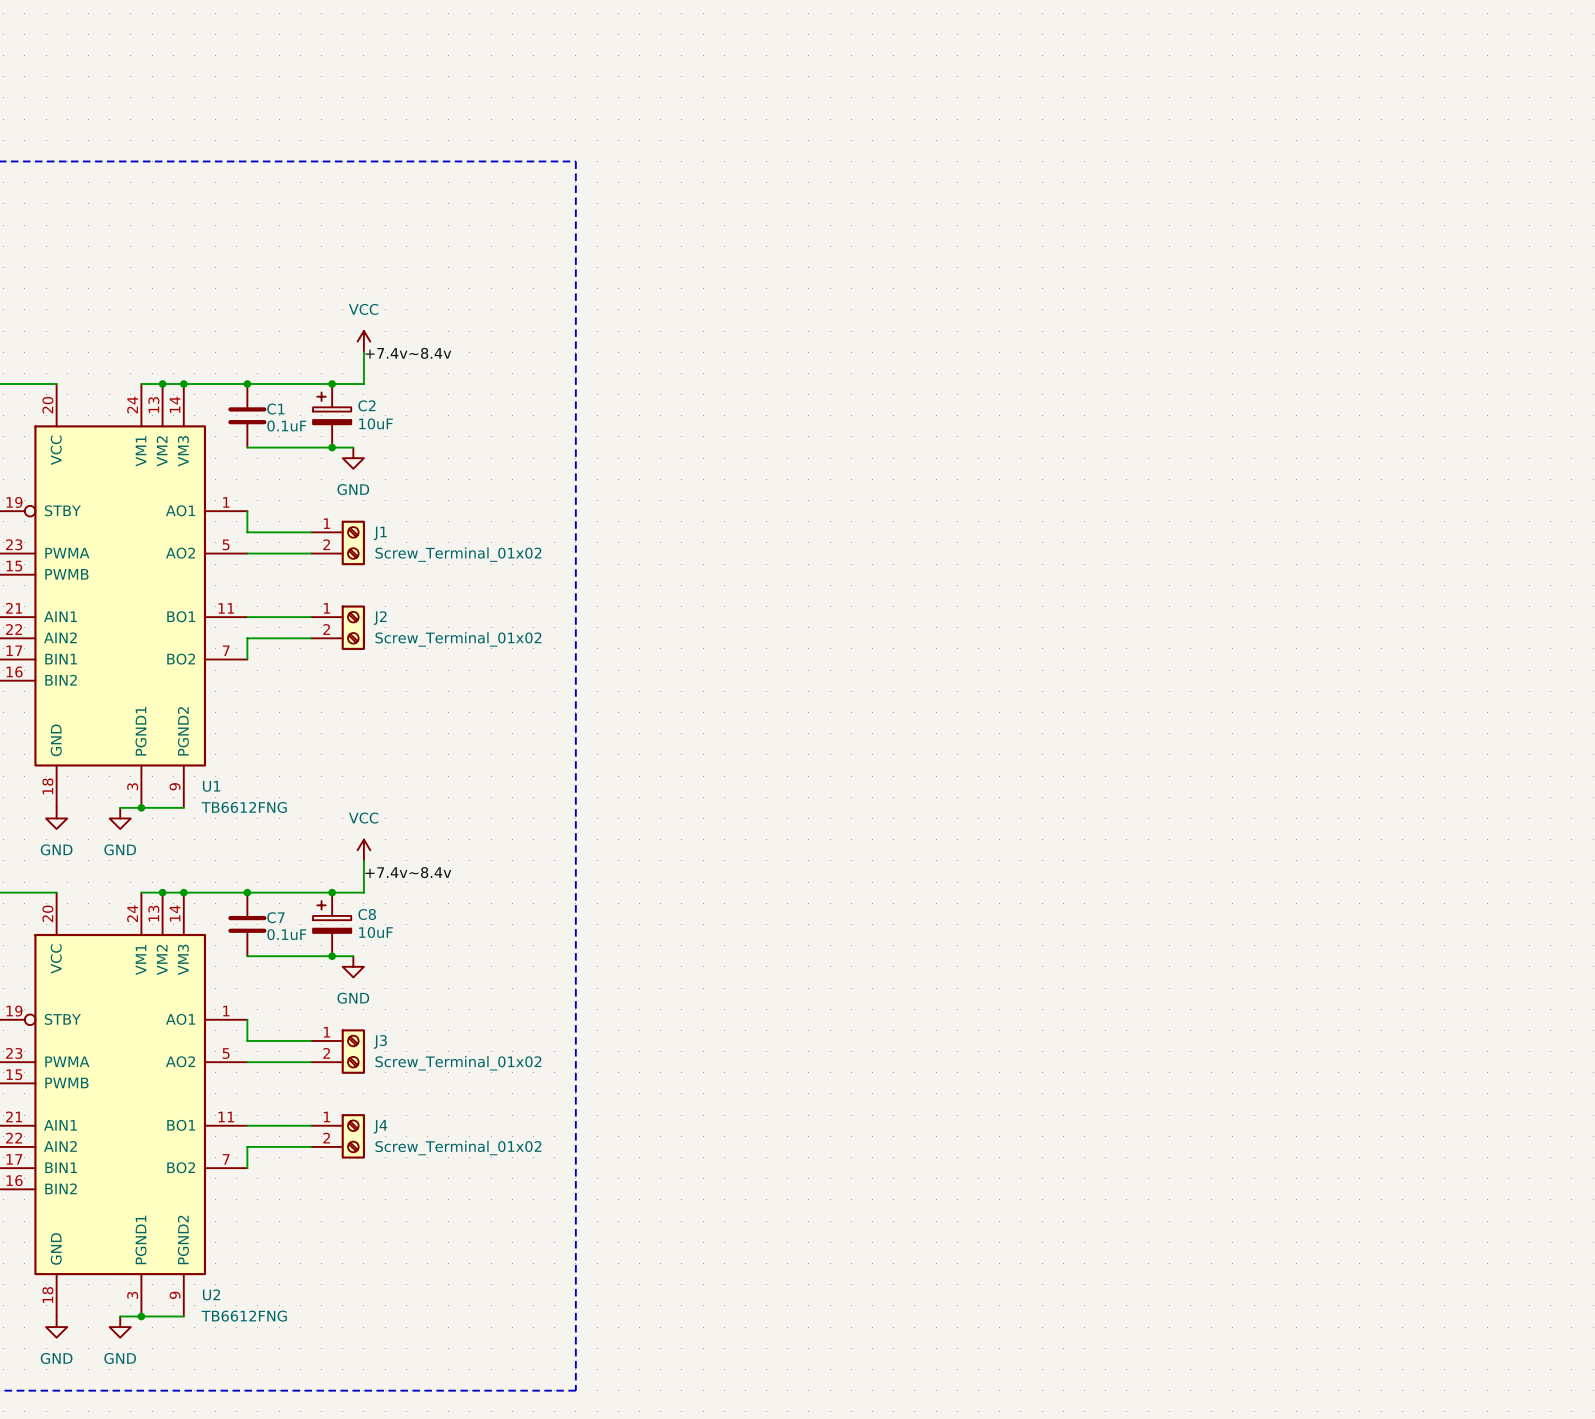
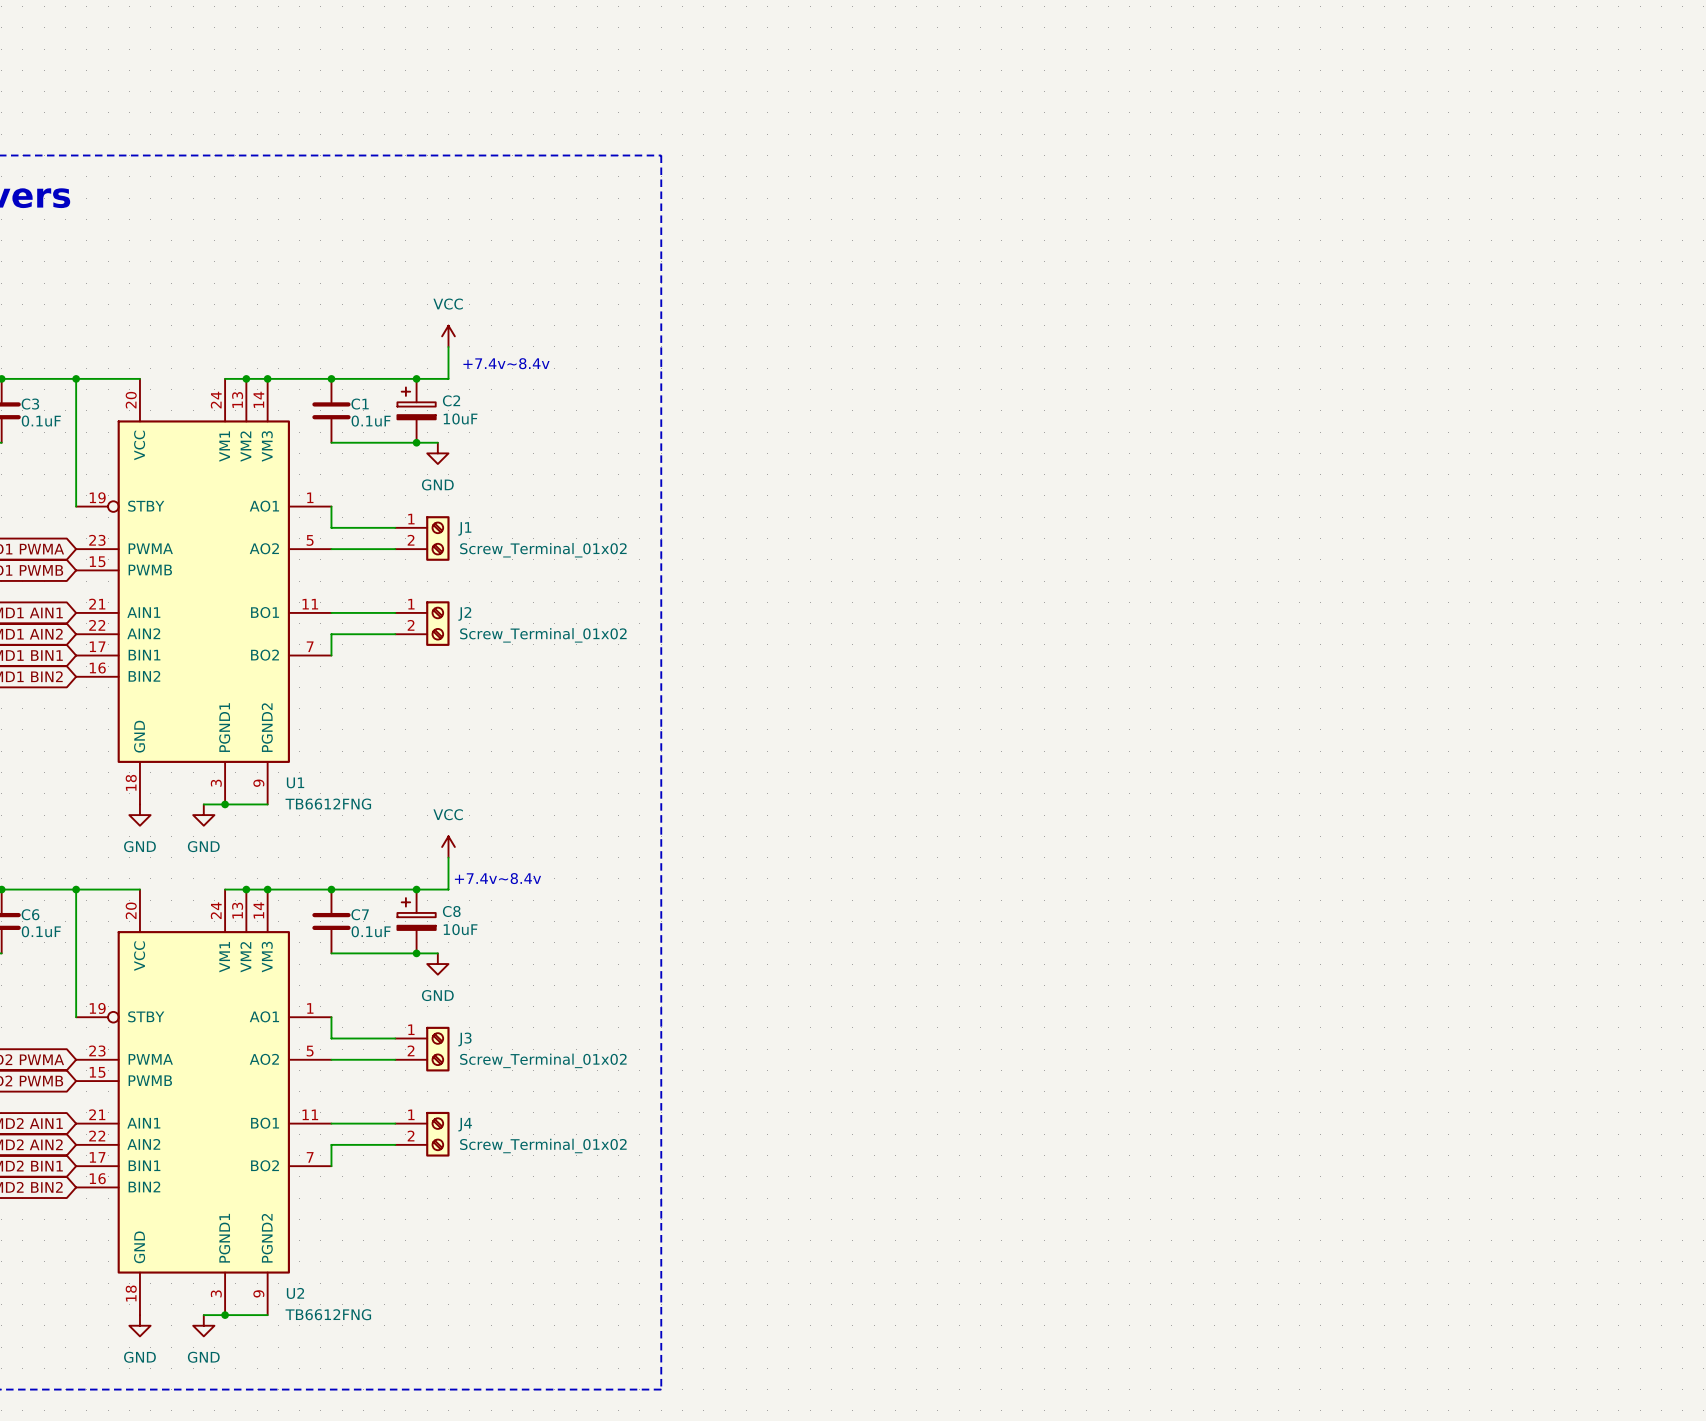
label: +7.4v~8.4v (408, 353) -> none
text: none -> +7.4v~8.4v (506, 363)
label: +7.4v~8.4v (408, 872) -> none
text: none -> +7.4v~8.4v (497, 878)

